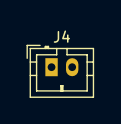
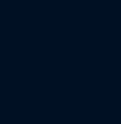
J4: (60, 71) -> none

